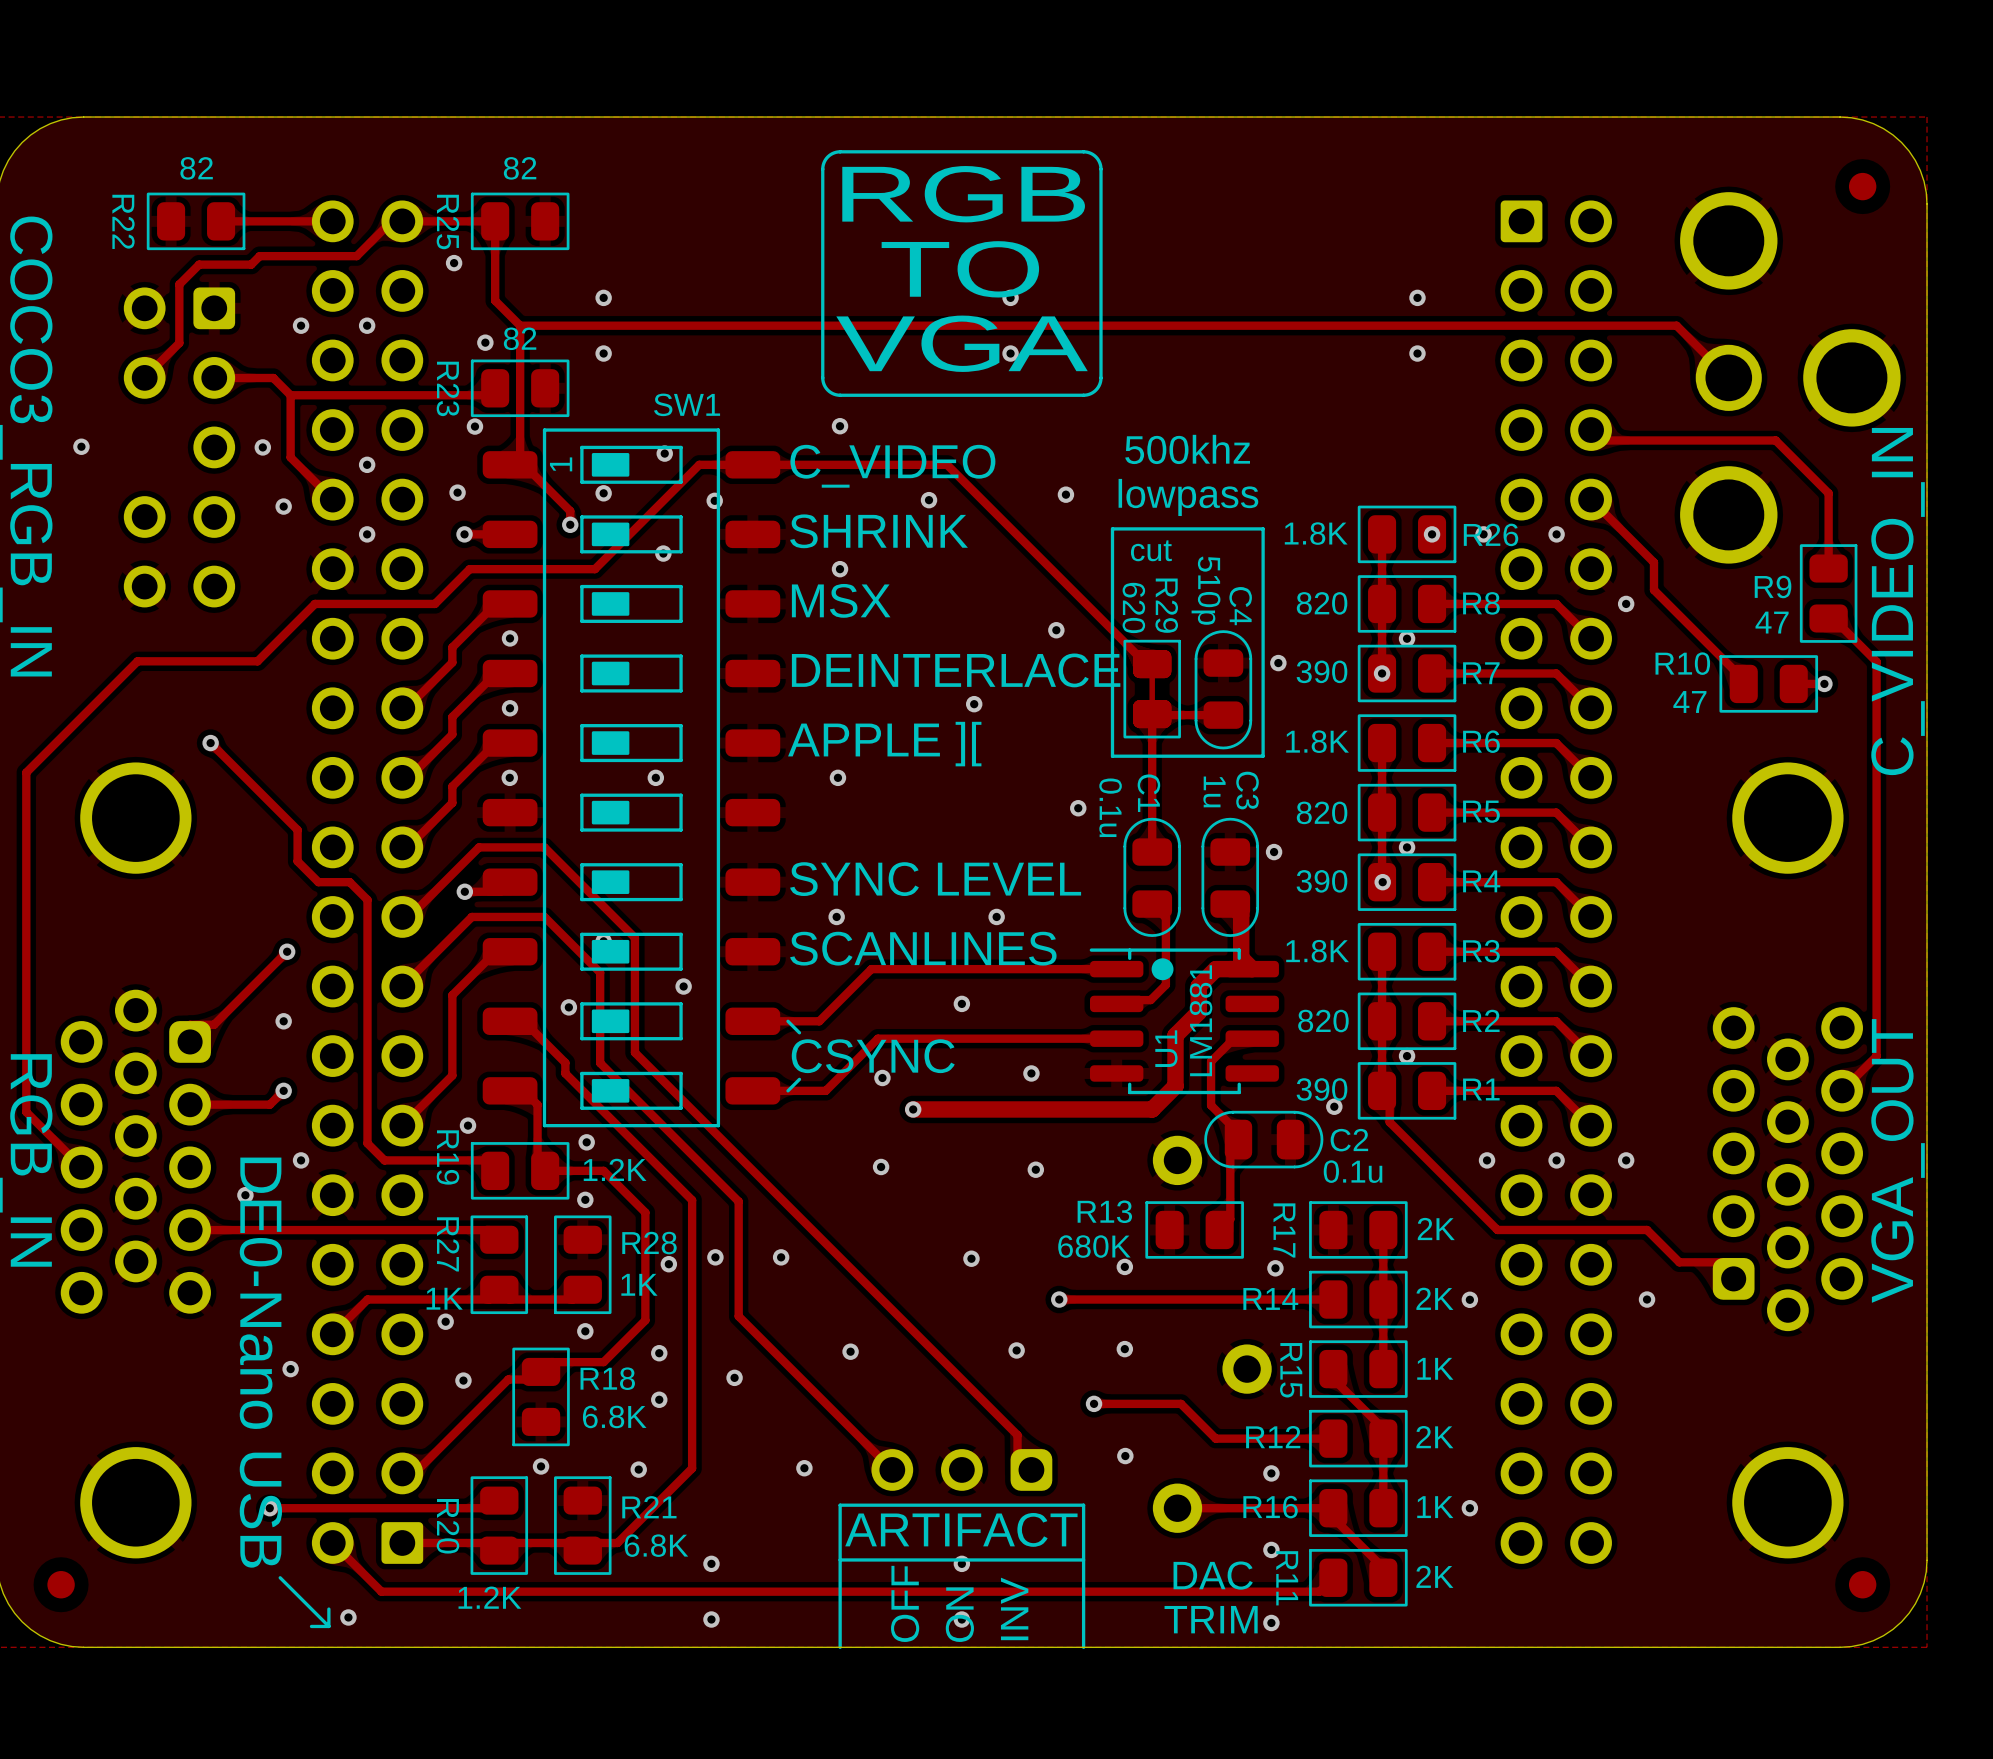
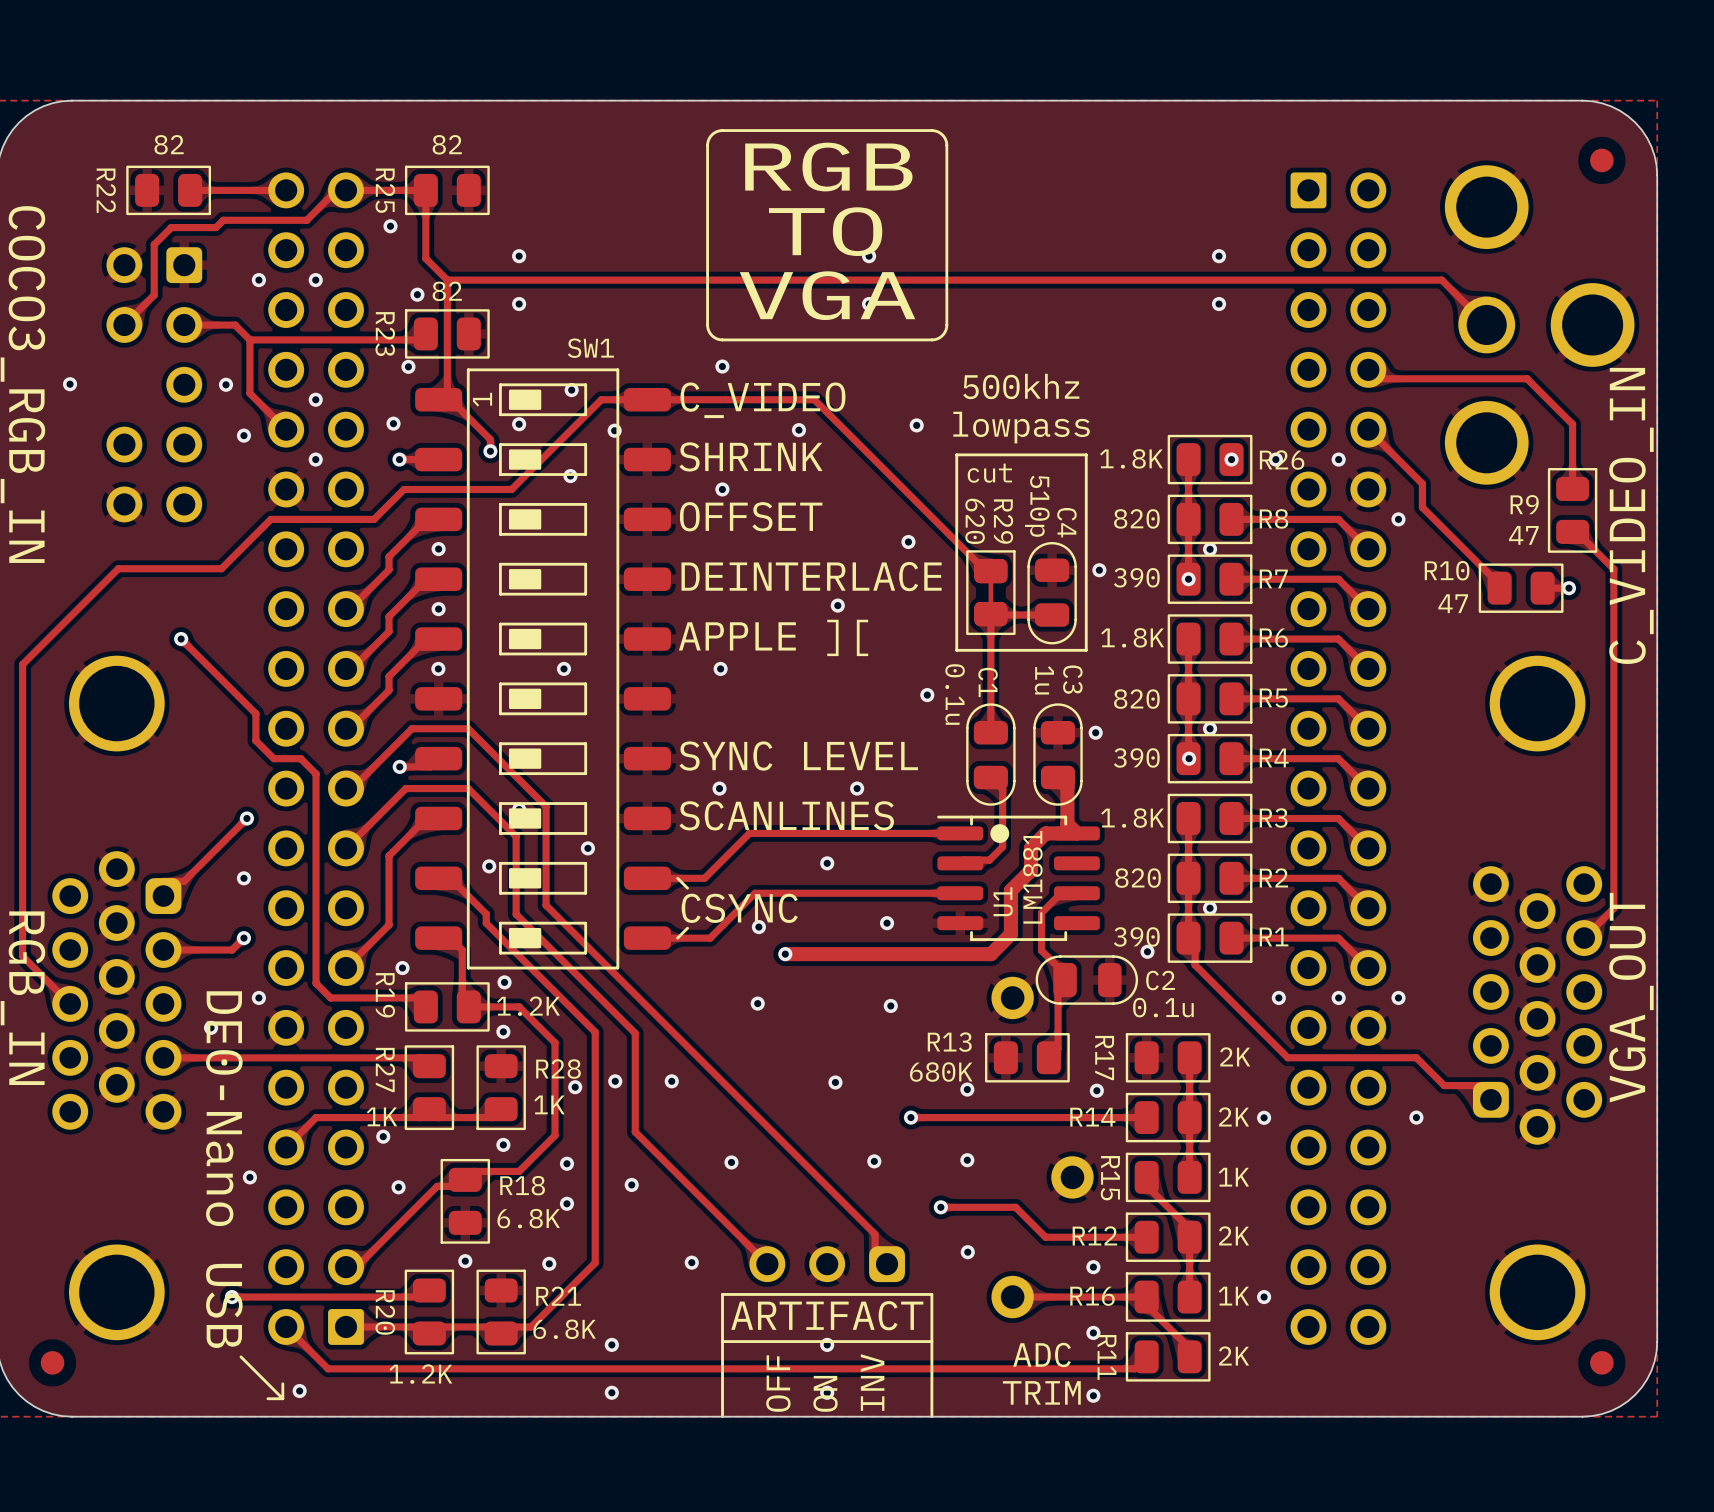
text: MSX (841, 600) -> OFFSET (751, 516)
text: DAC (1213, 1575) -> ADC (1042, 1354)

